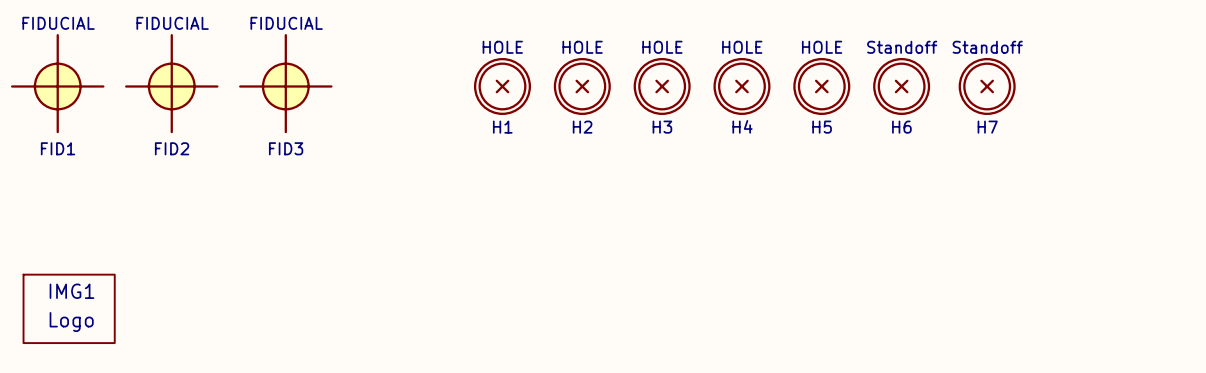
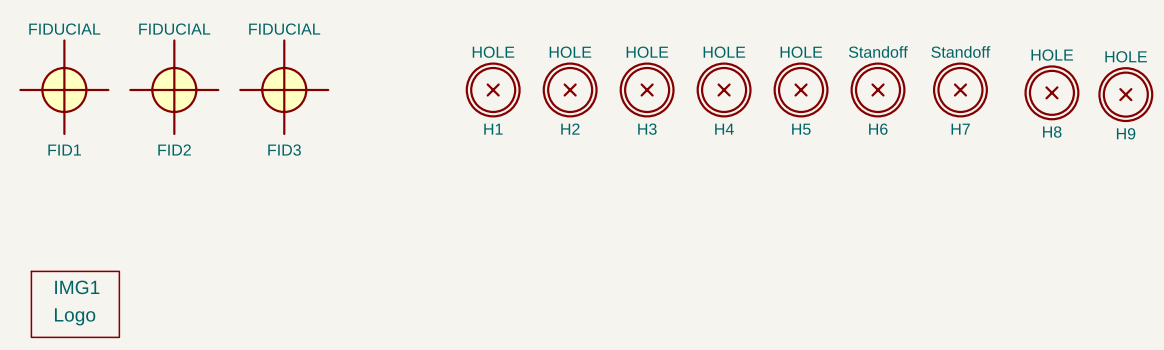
H8: none -> HOLE (1051, 92)
H9: none -> HOLE (1125, 94)

